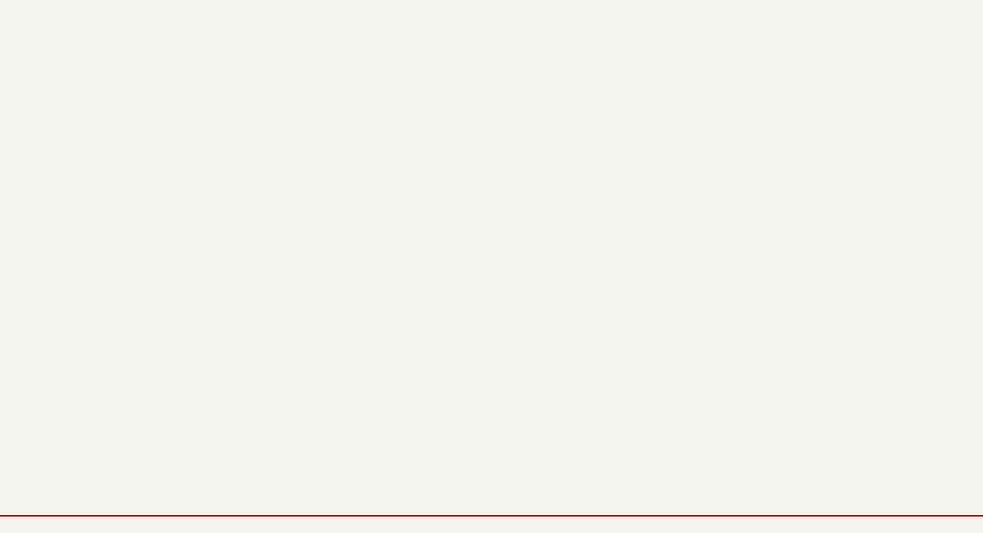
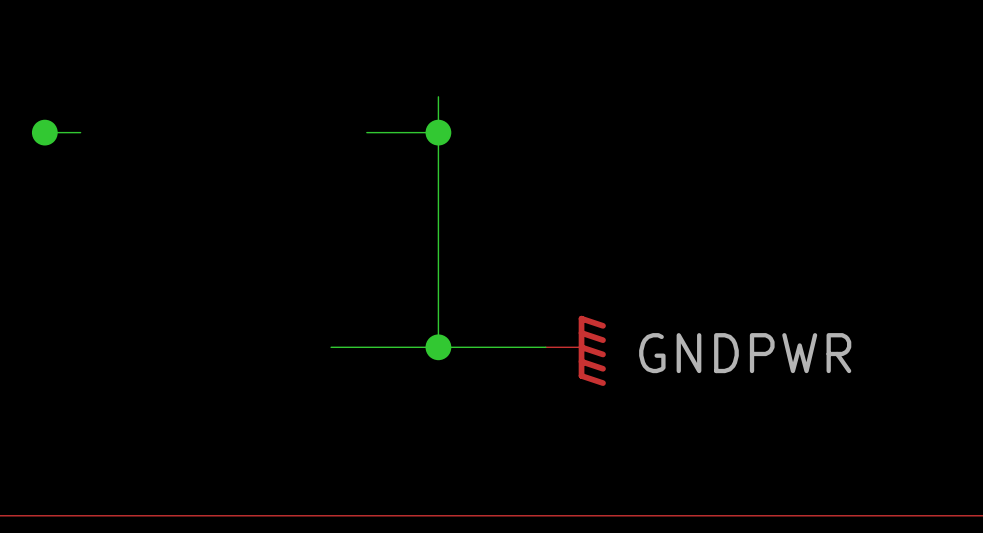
wire: none -> (438, 96) (438, 347)
wire: none -> (44, 132) (80, 132)
junction: none -> (44, 132)
wire: none -> (366, 132) (438, 132)
junction: none -> (438, 132)
wire: none -> (331, 347) (545, 347)
junction: none -> (438, 347)
power symbol: none -> GNDPWR (575, 350)

